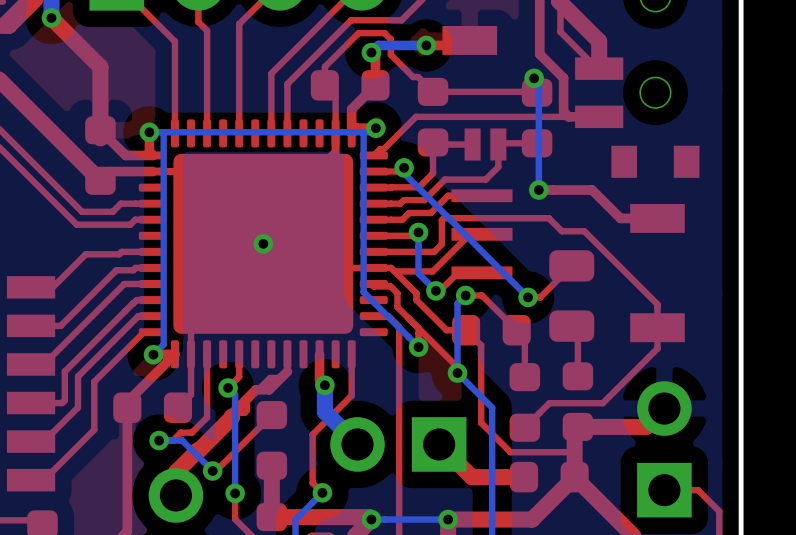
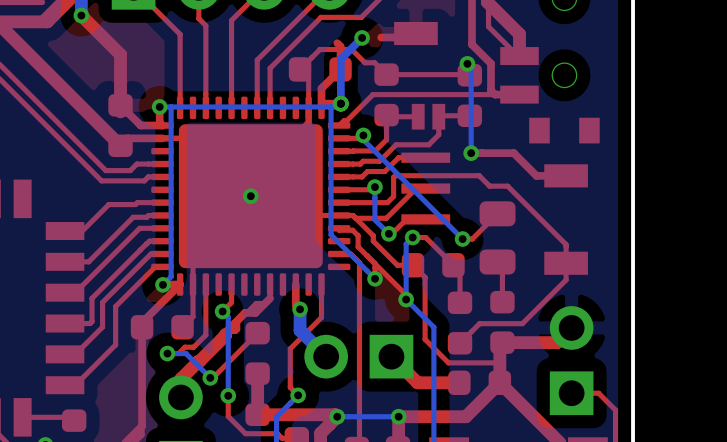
bottom track: none -> (362, 37) (340, 59) (340, 103)
via: none -> (362, 37)
bottom track: (426, 45) (378, 45) (371, 52) -> none
via: (426, 45) -> none
via: (371, 52) -> none
top track: (413, 77) (390, 54) (390, 39) (384, 33) (358, 33) (324, 66) (324, 85) -> (370, 62) (364, 62) (351, 49) (319, 49) (300, 69)

